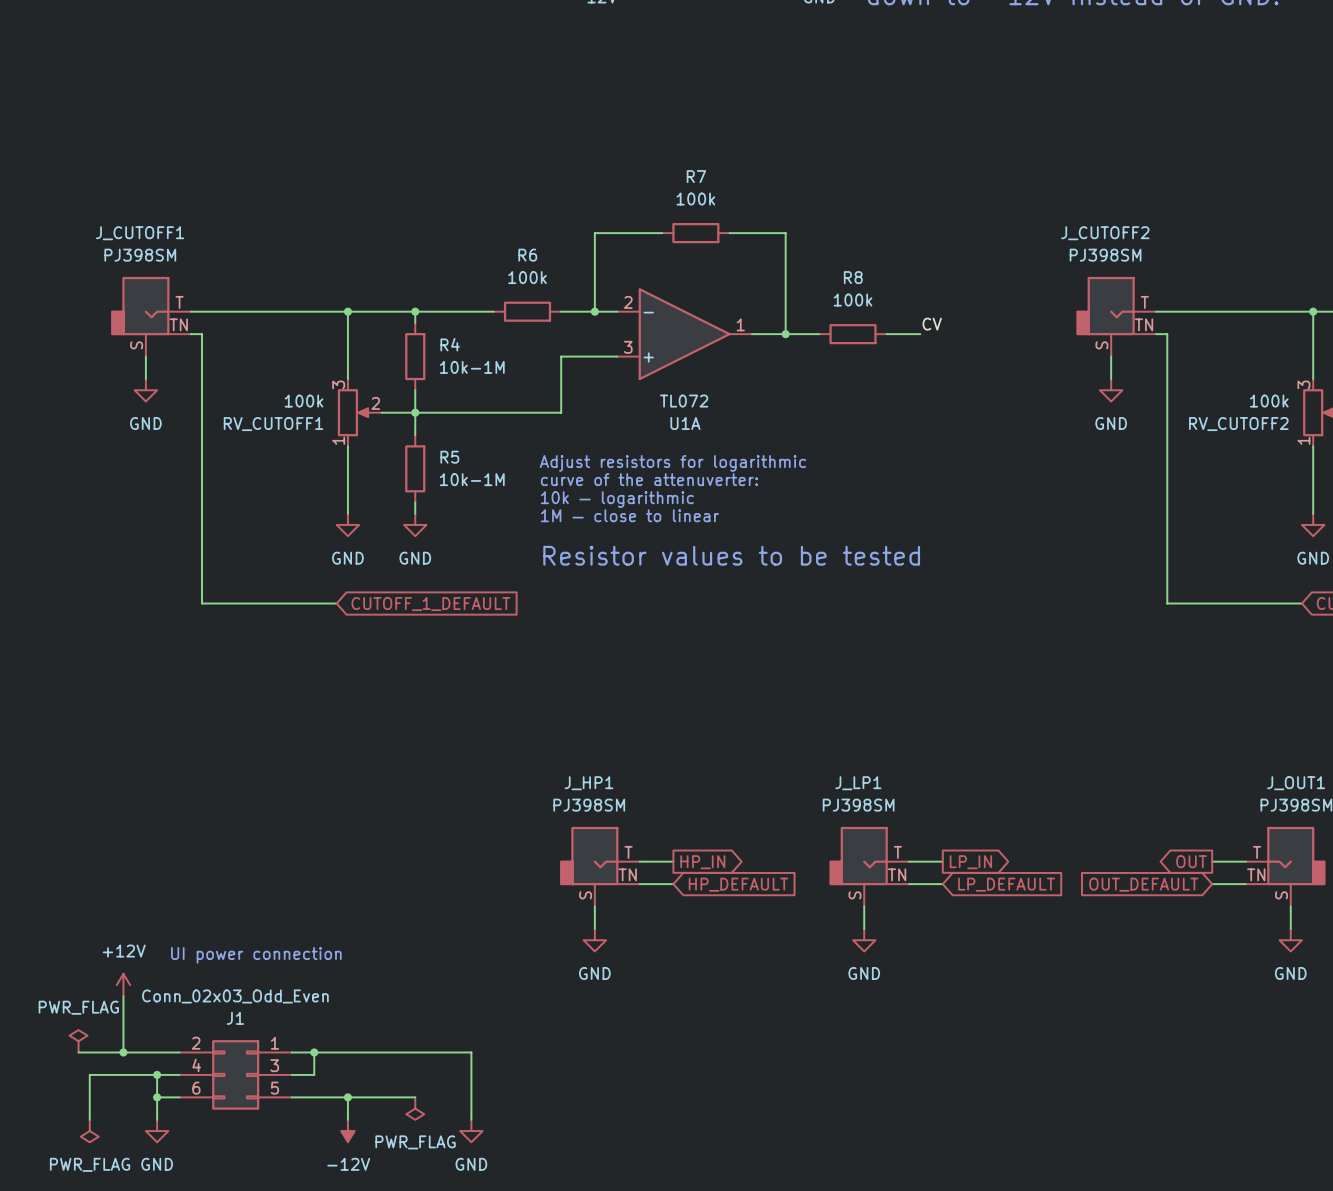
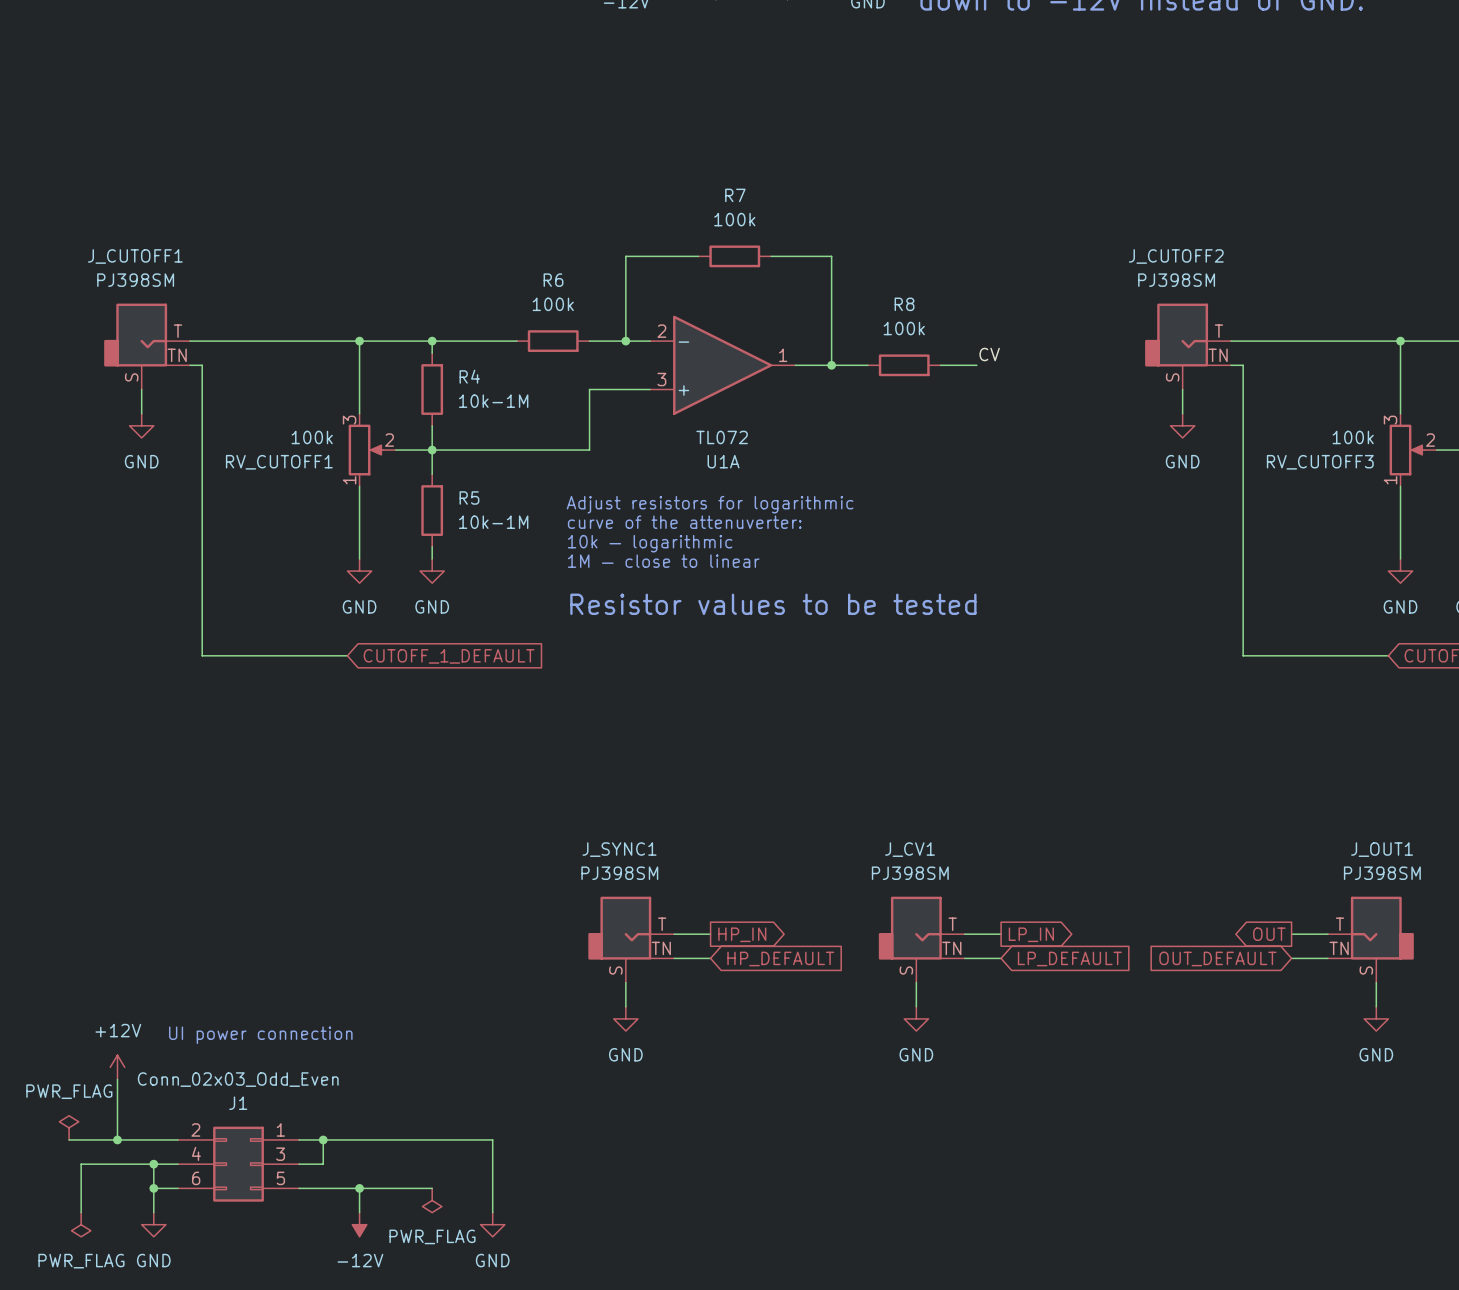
RV_CUTOFF2 name: RV_CUTOFF2 (1238, 424) -> RV_CUTOFF3 (1320, 462)
J_HP1 name: J_HP1 (588, 783) -> J_SYNC1 (619, 849)
J_LP1 name: J_LP1 (858, 783) -> J_CV1 (910, 849)

